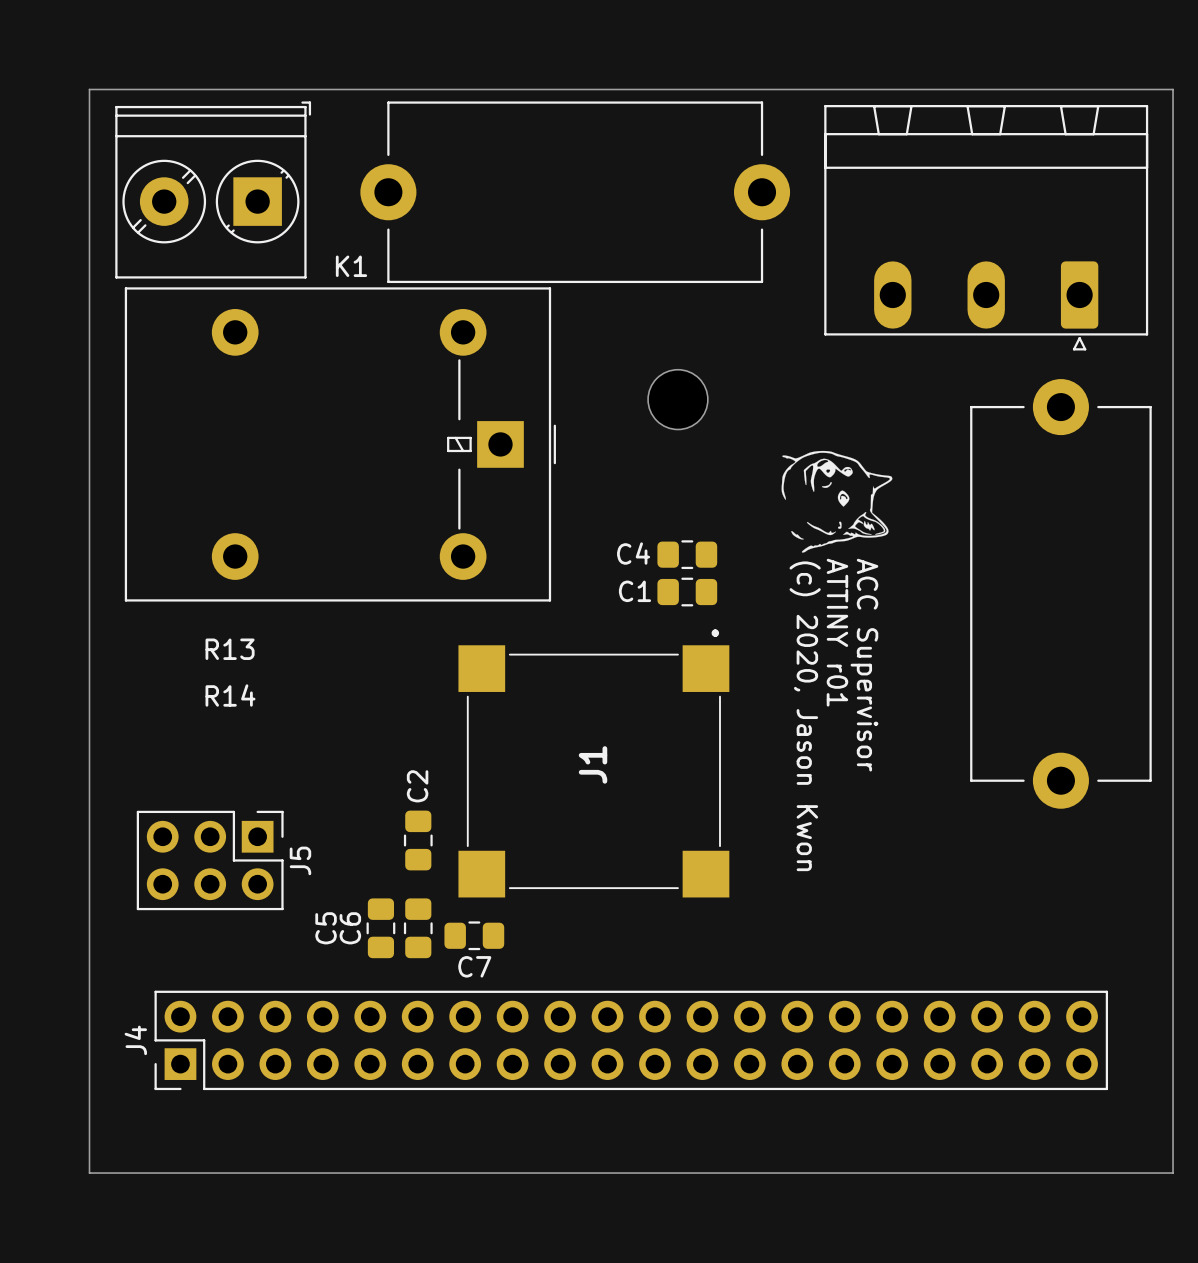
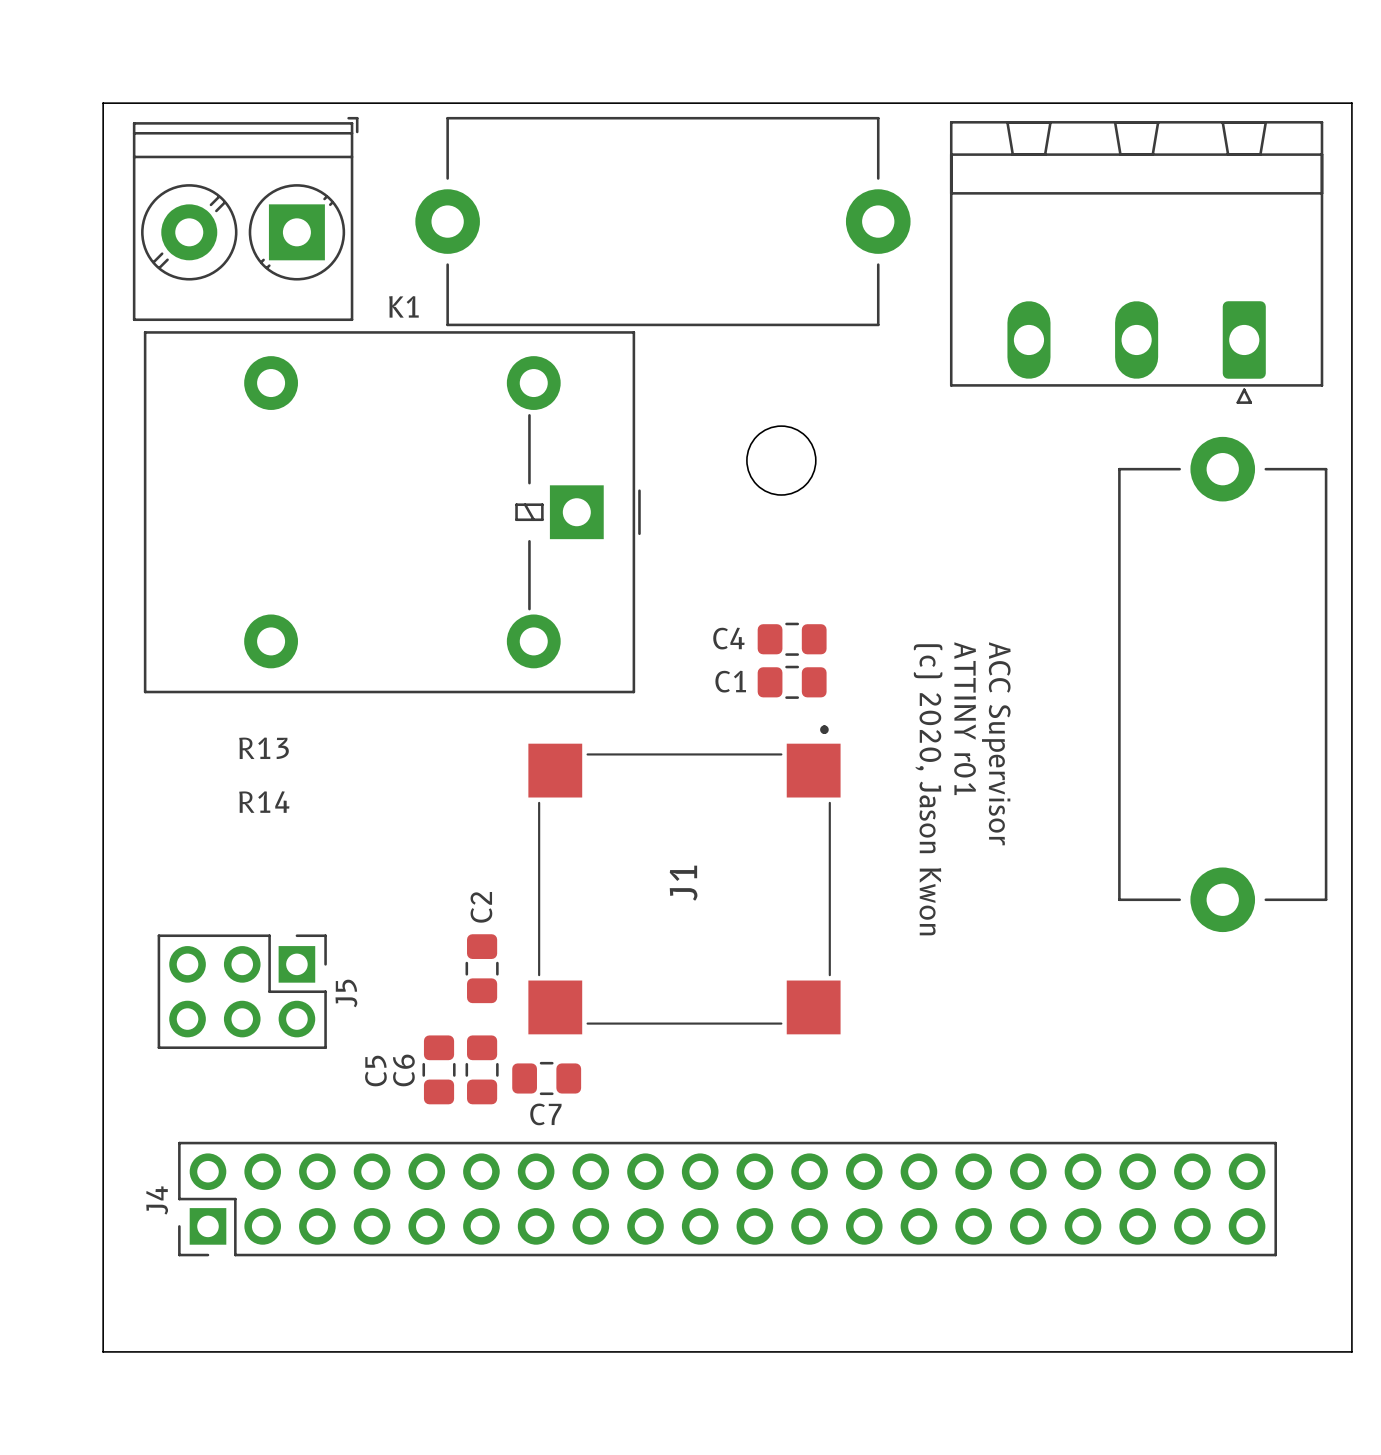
drawing: [781, 450, 893, 553] -> none

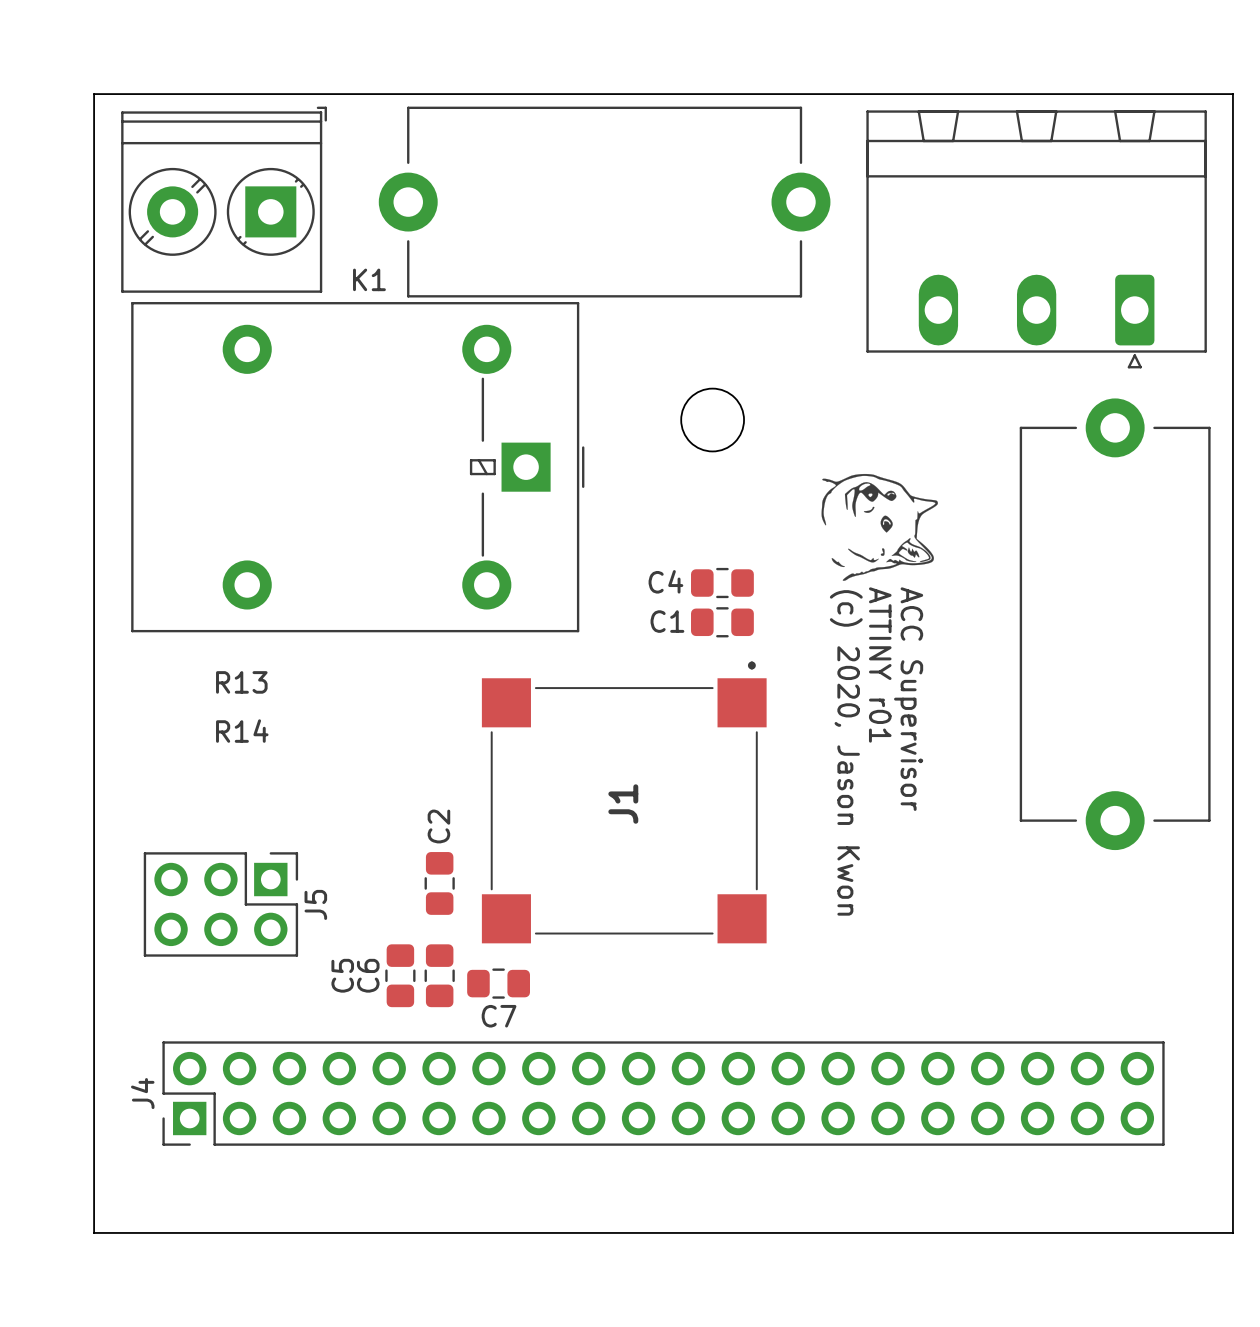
drawing: none -> [821, 473, 938, 581]

